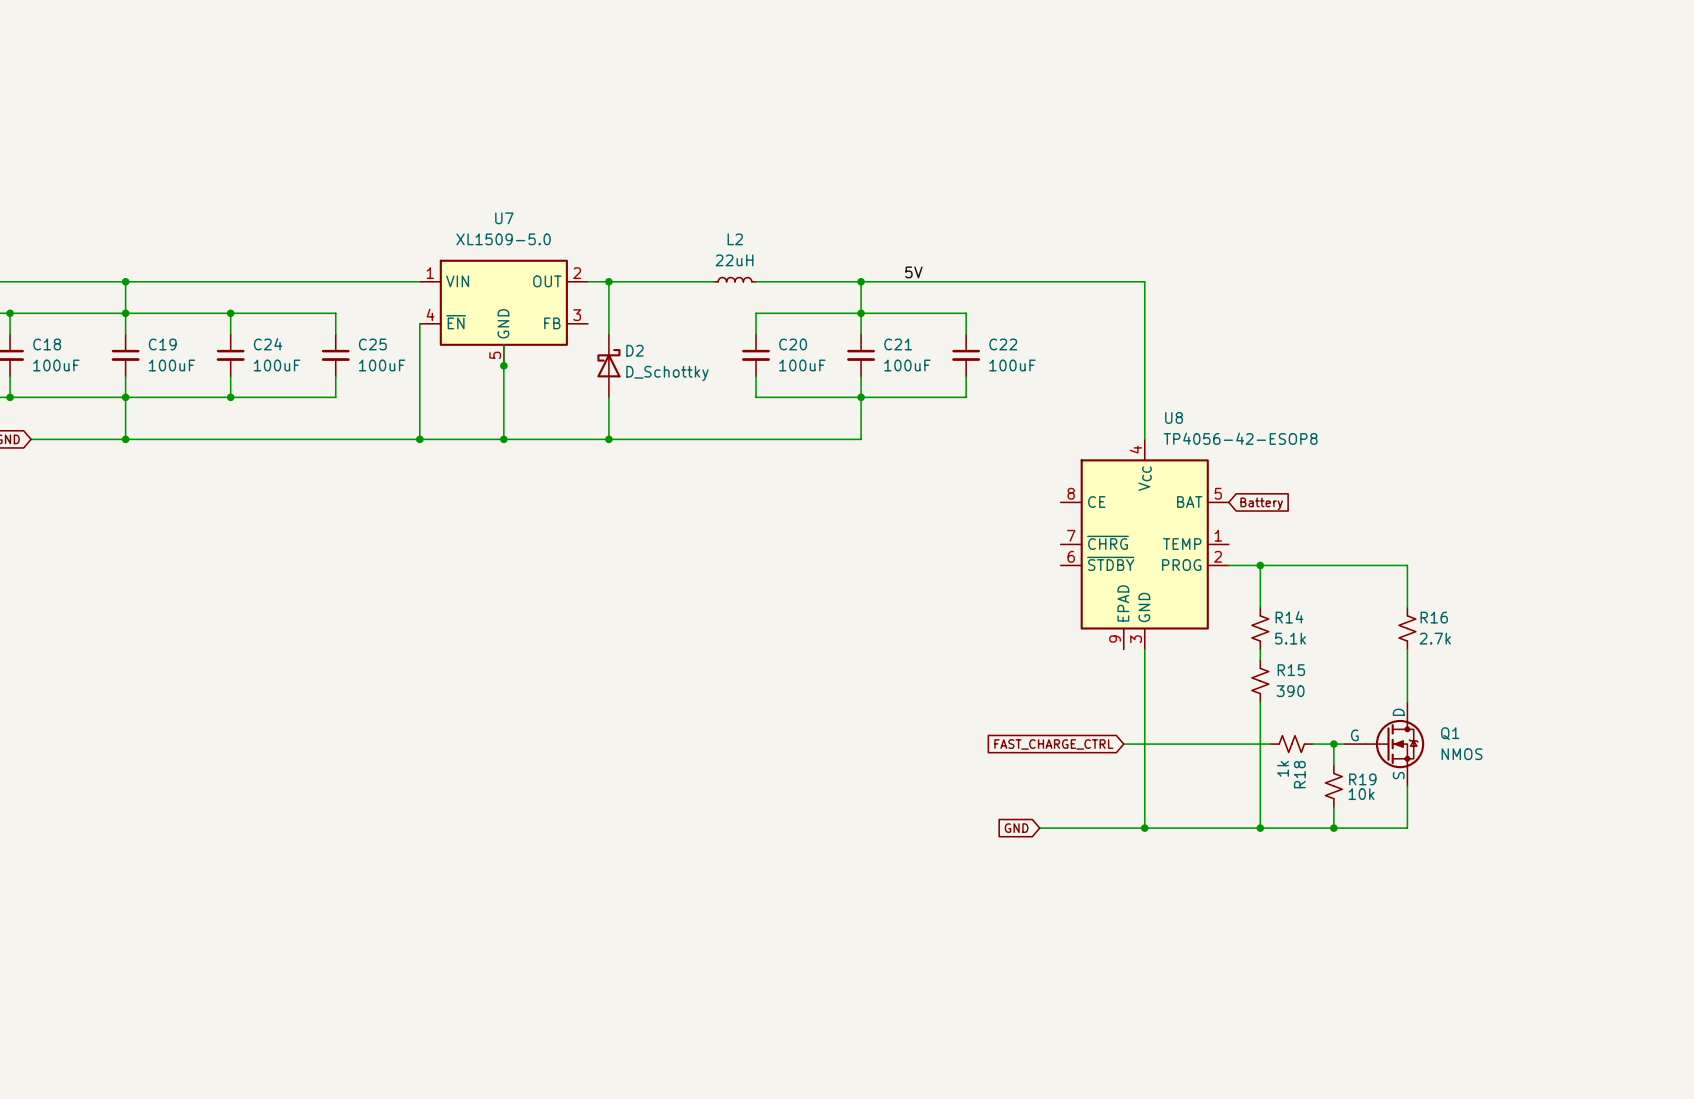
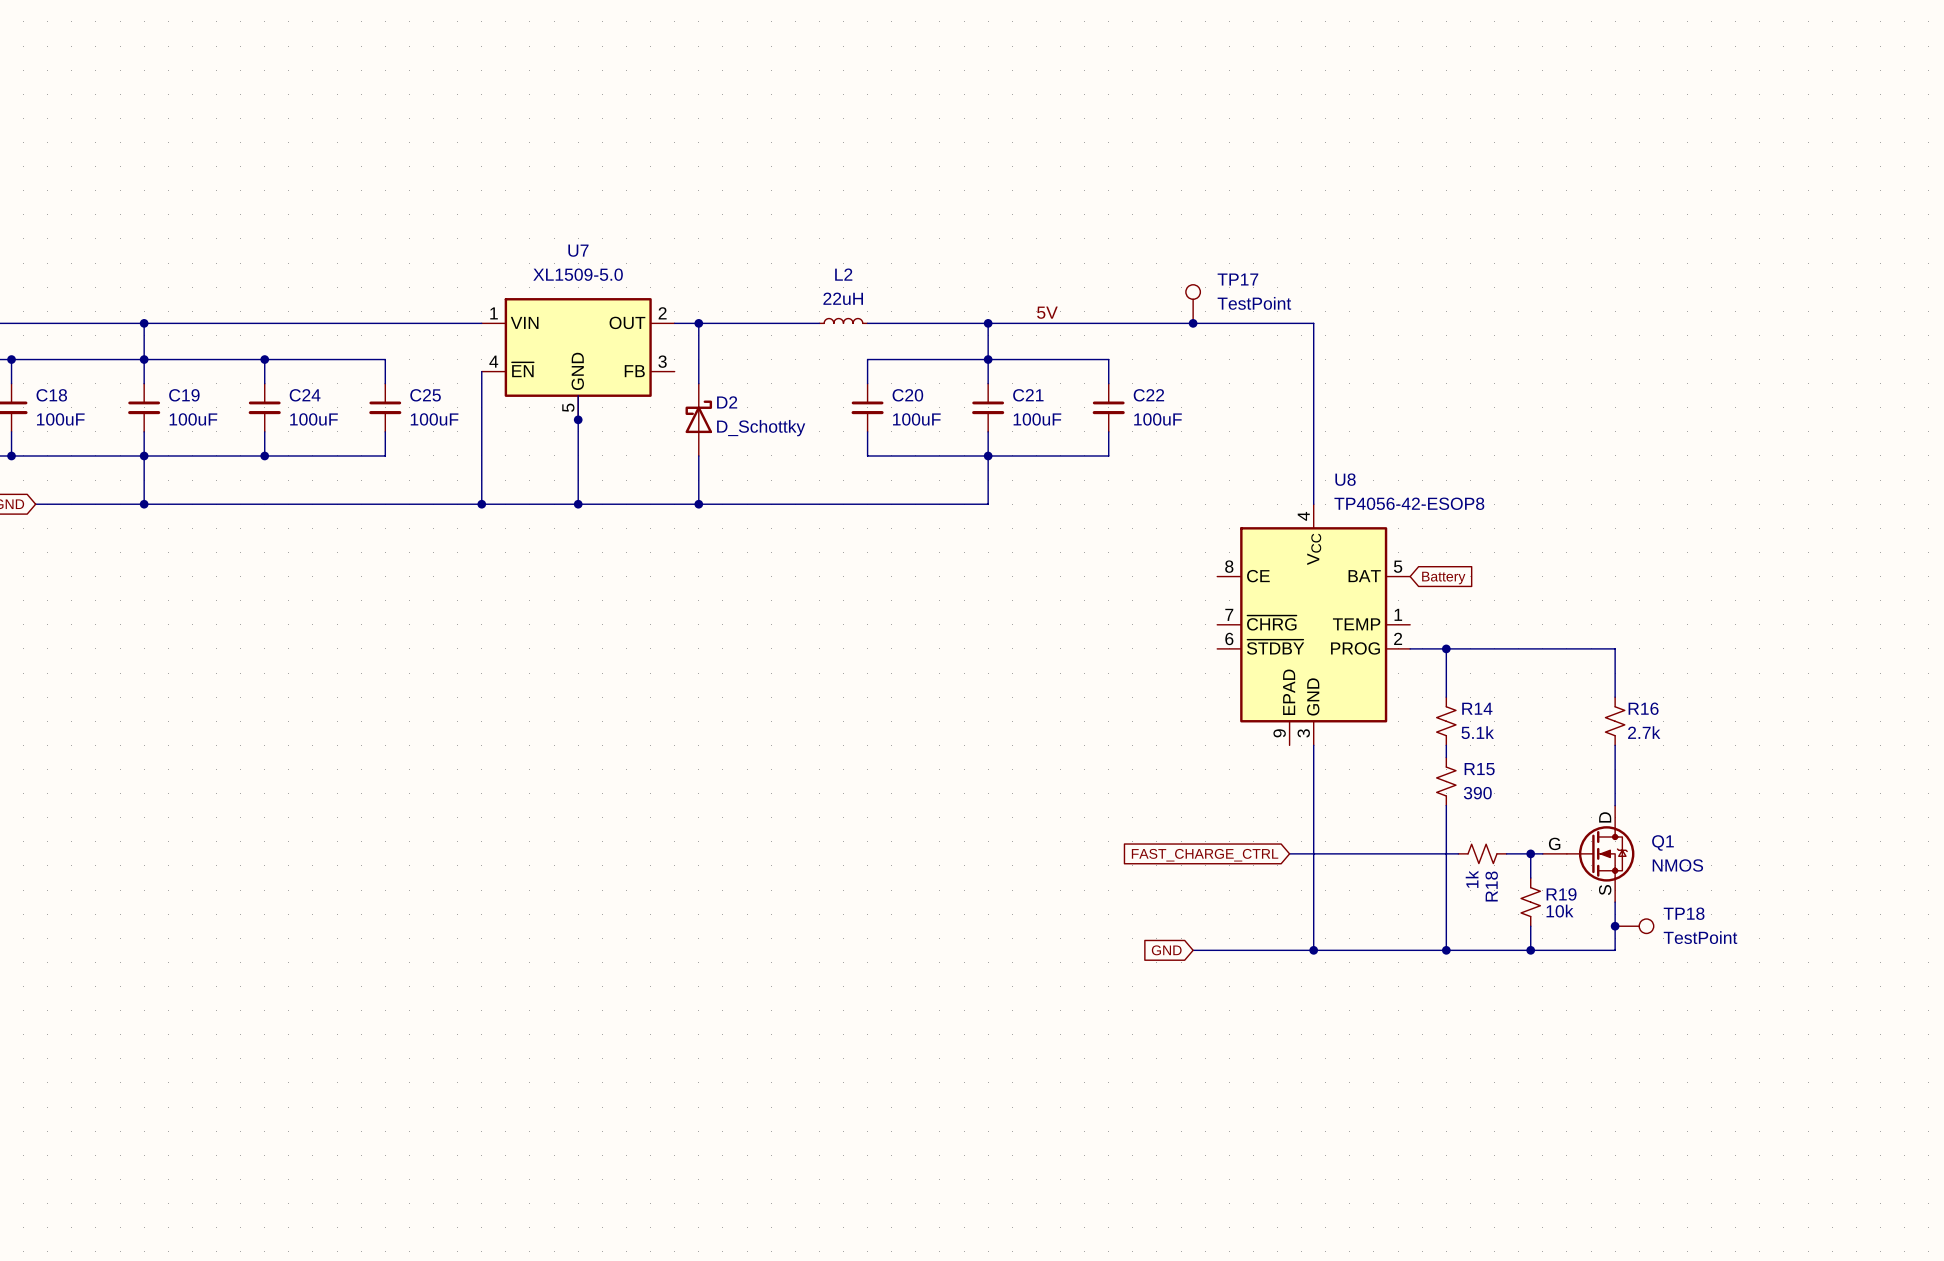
TP17: none -> TestPoint (1193, 304)
junction: none -> (1193, 323)
junction: none -> (1615, 926)
TP18: none -> TestPoint (1634, 926)

